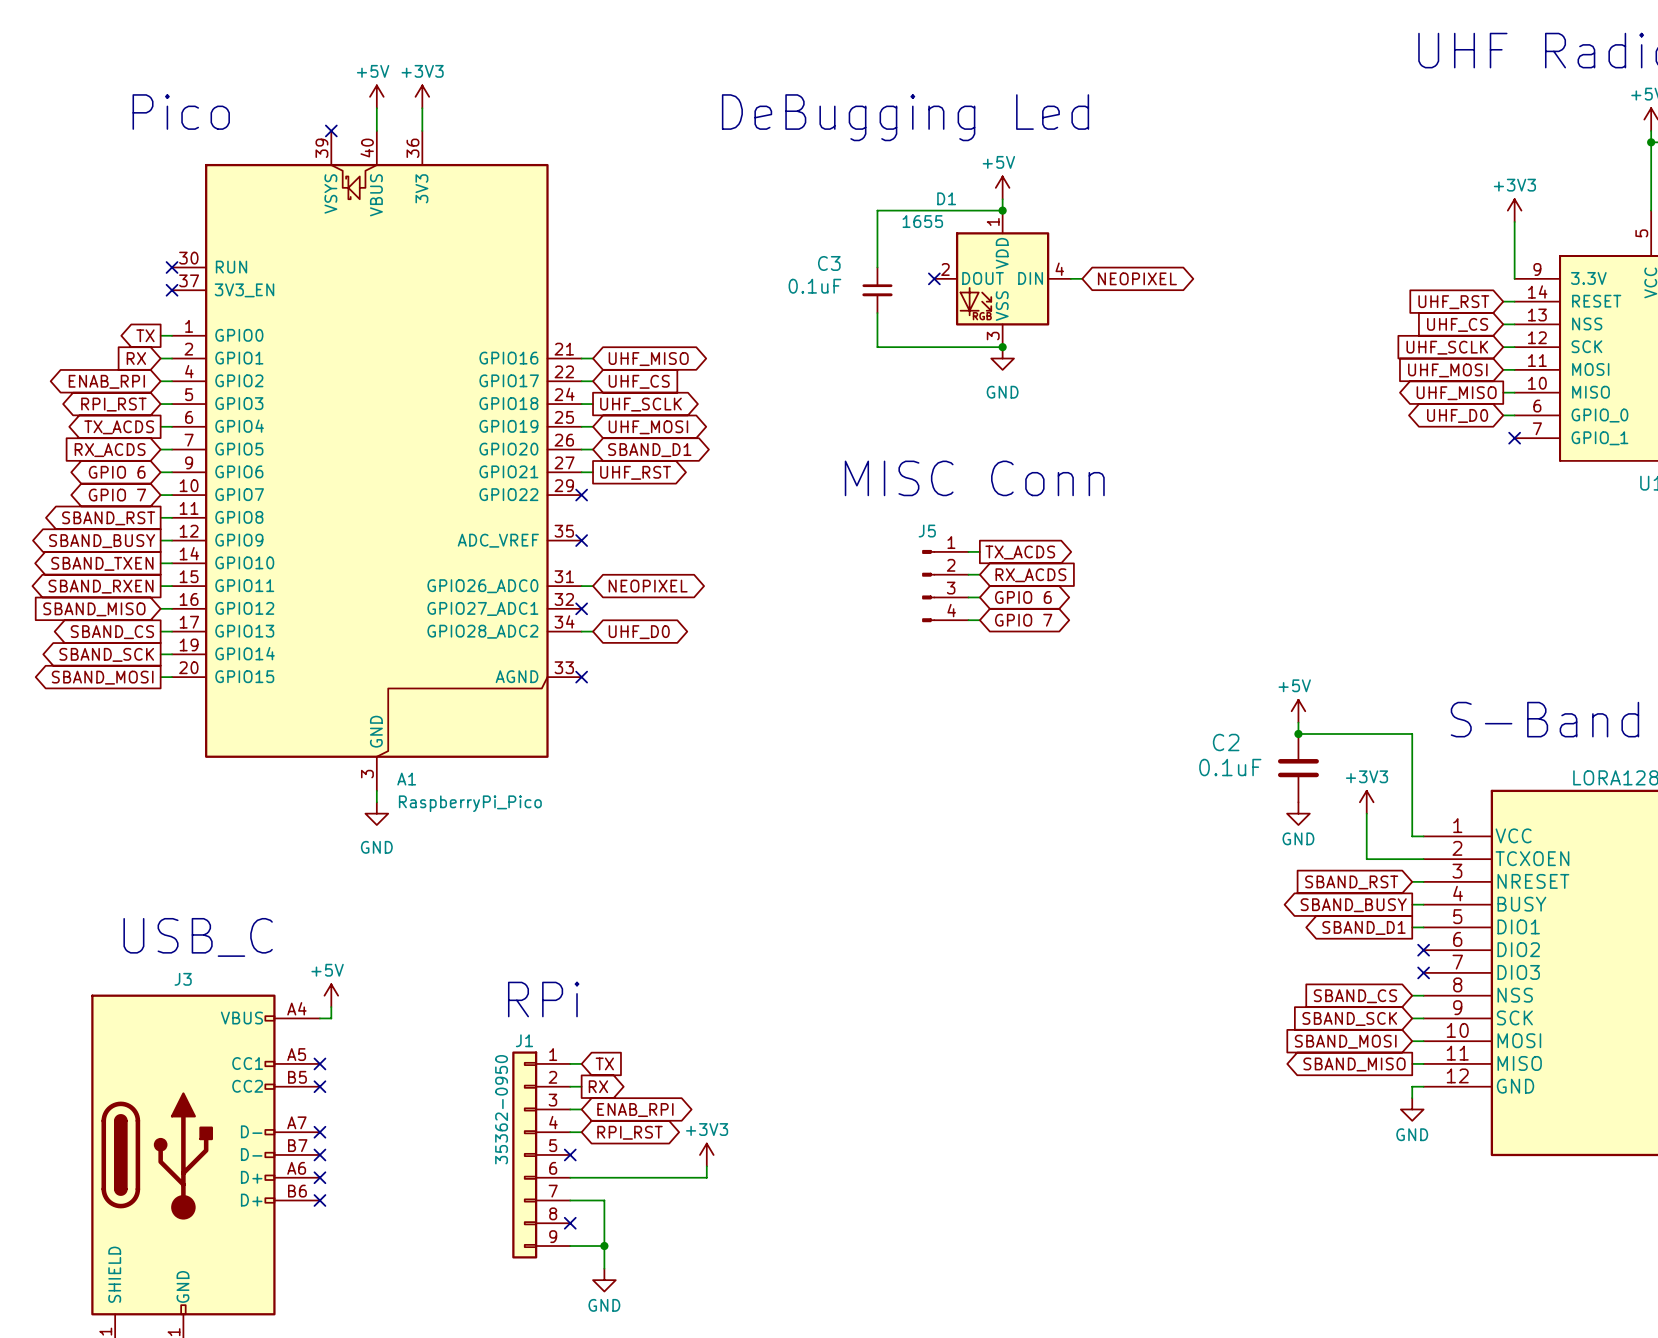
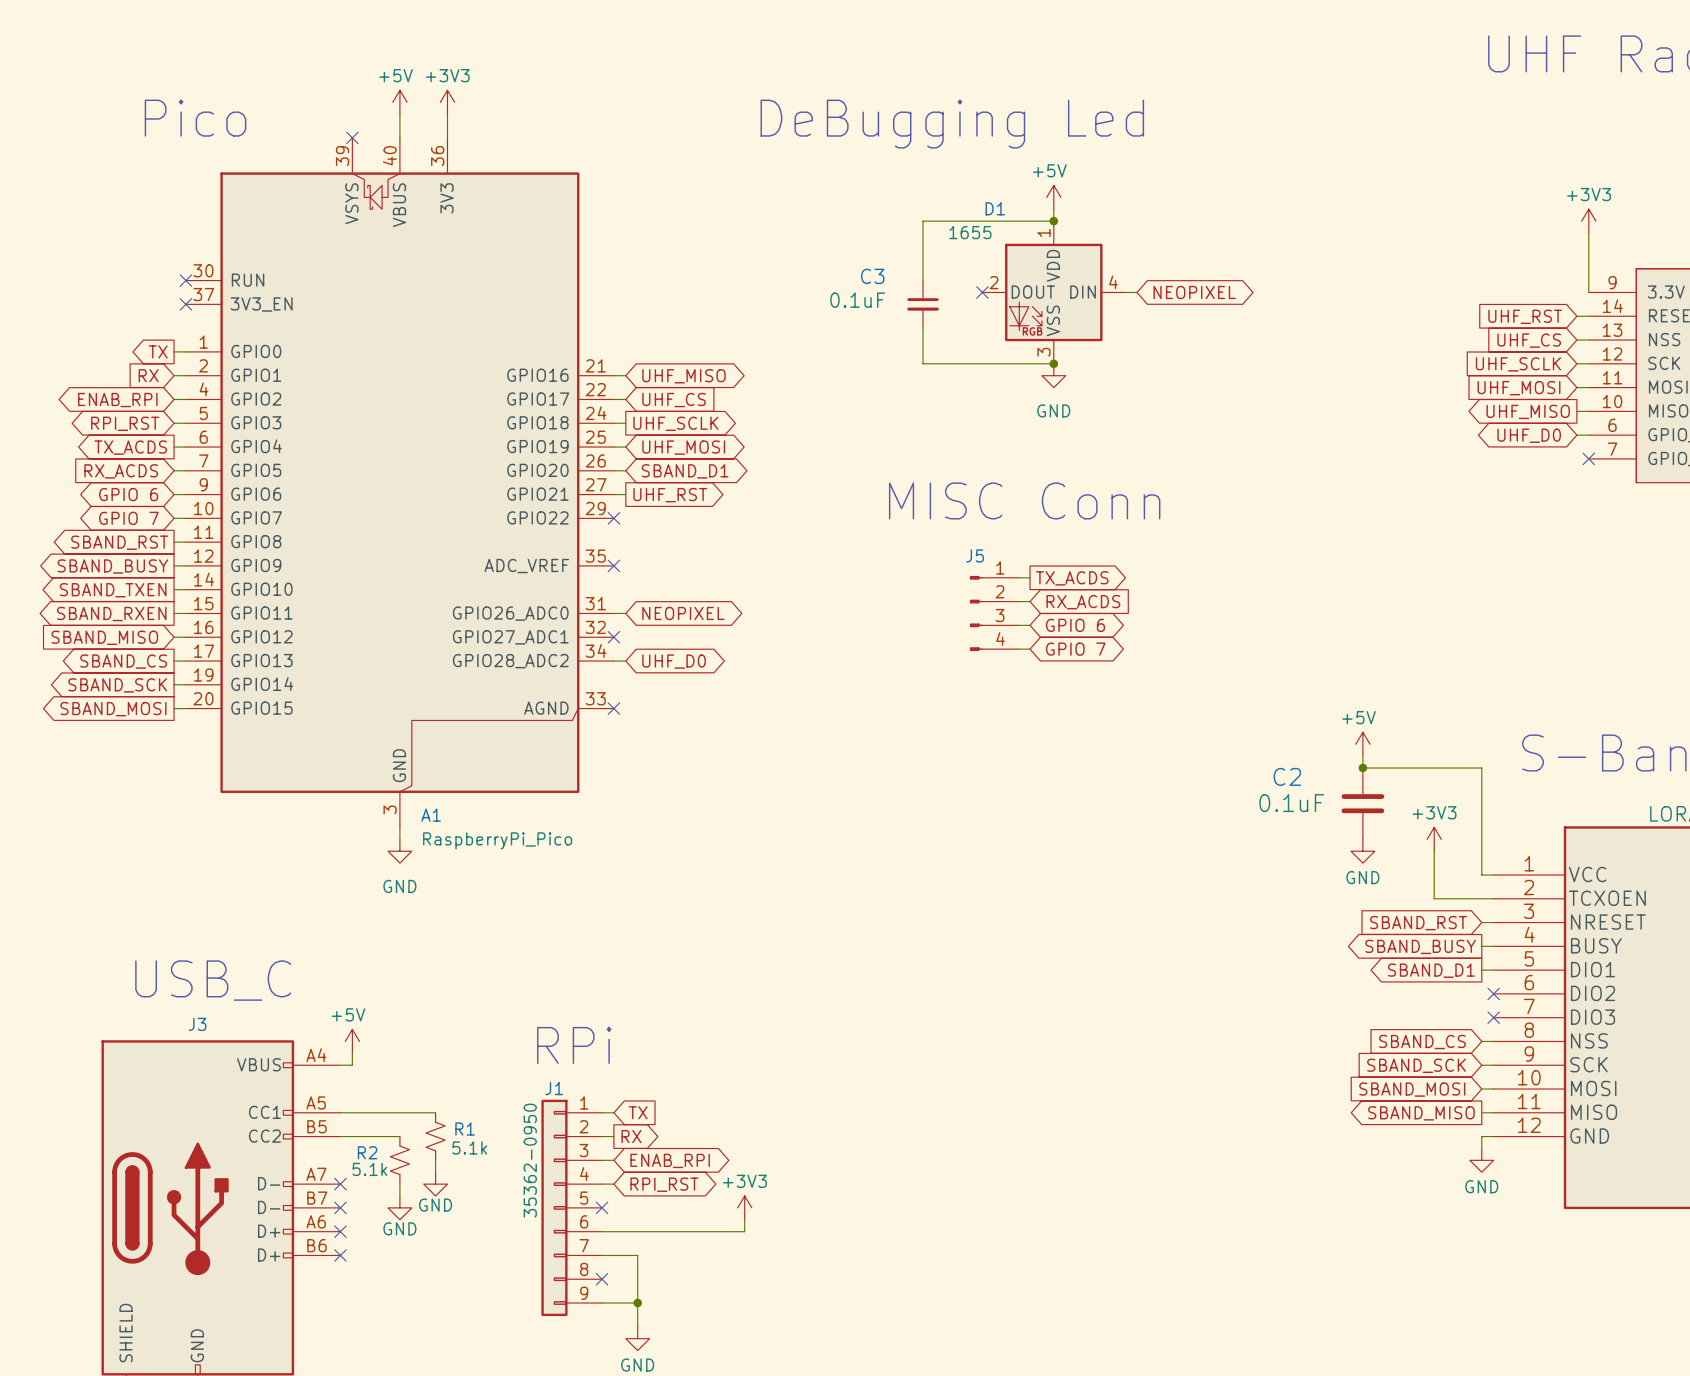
wire: none -> (340, 1112) (435, 1112)
no-connect mark: (319, 1063) -> none
wire: none -> (340, 1136) (399, 1136)
no-connect mark: (319, 1086) -> none
R1: none -> 5.1k (435, 1136)
R2: none -> 5.1k (399, 1160)
wire: none -> (435, 1160) (435, 1172)
wire: none -> (399, 1184) (399, 1196)
power symbol: none -> GND (435, 1184)
power symbol: none -> GND (399, 1207)

